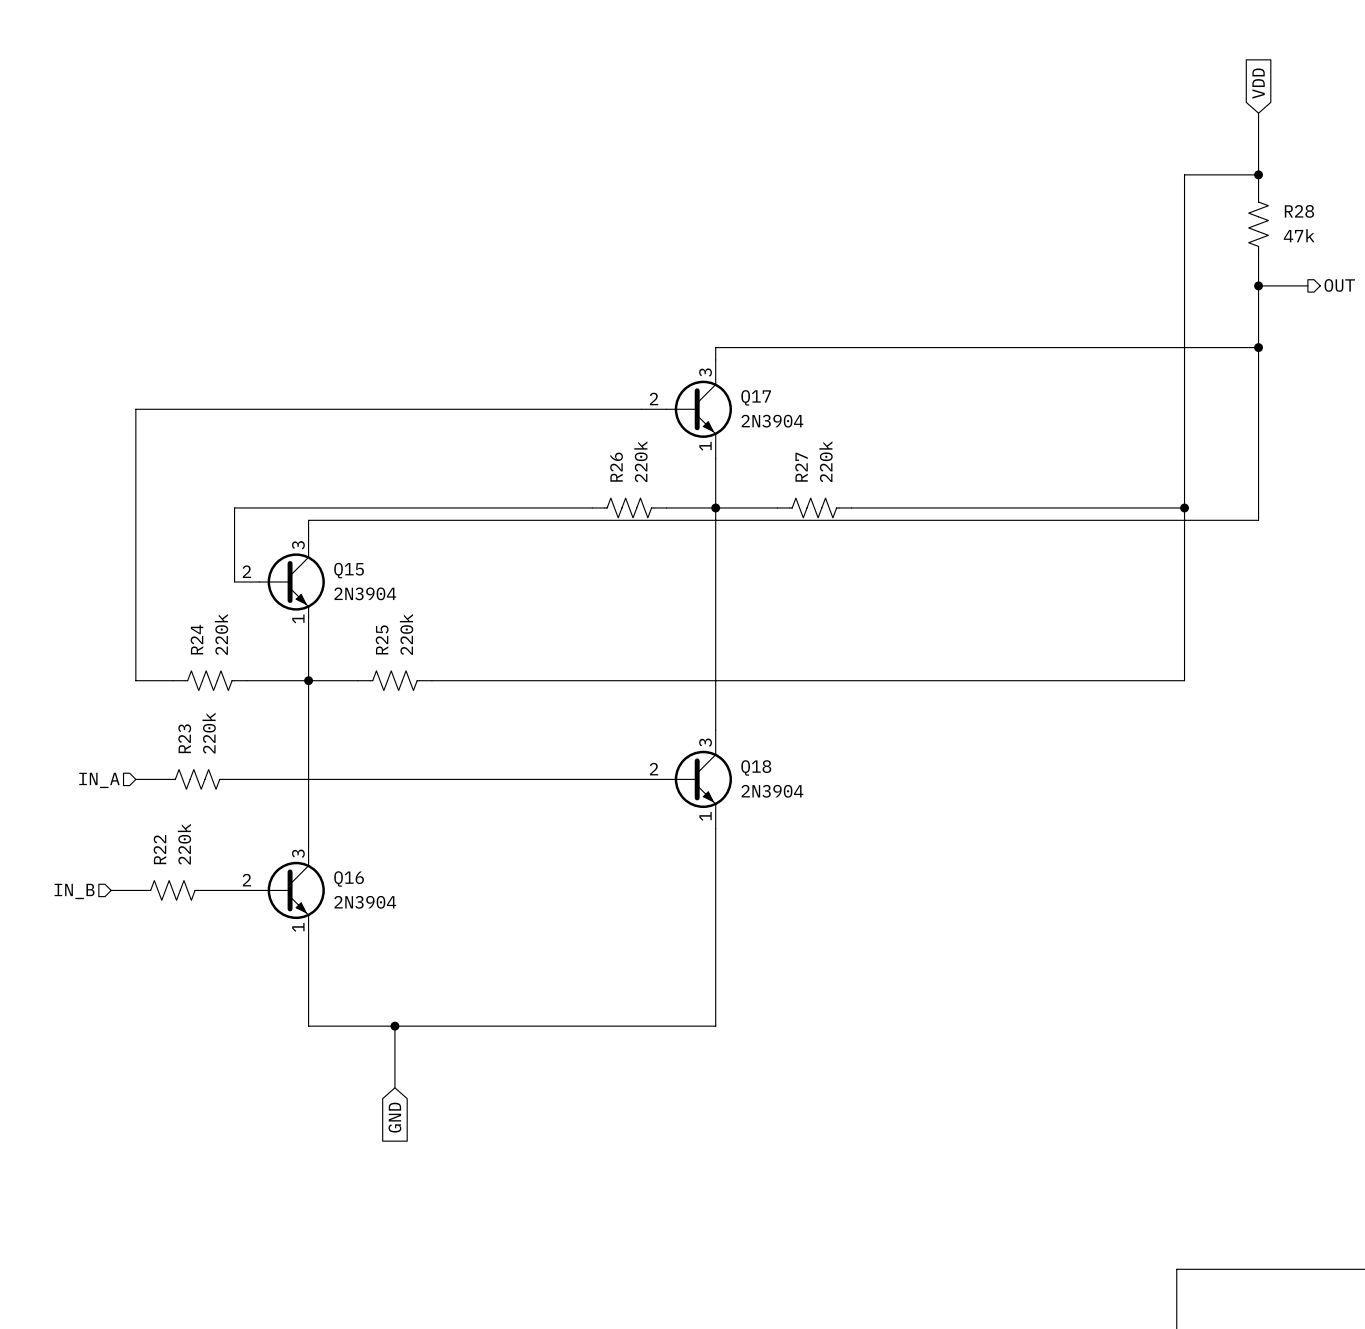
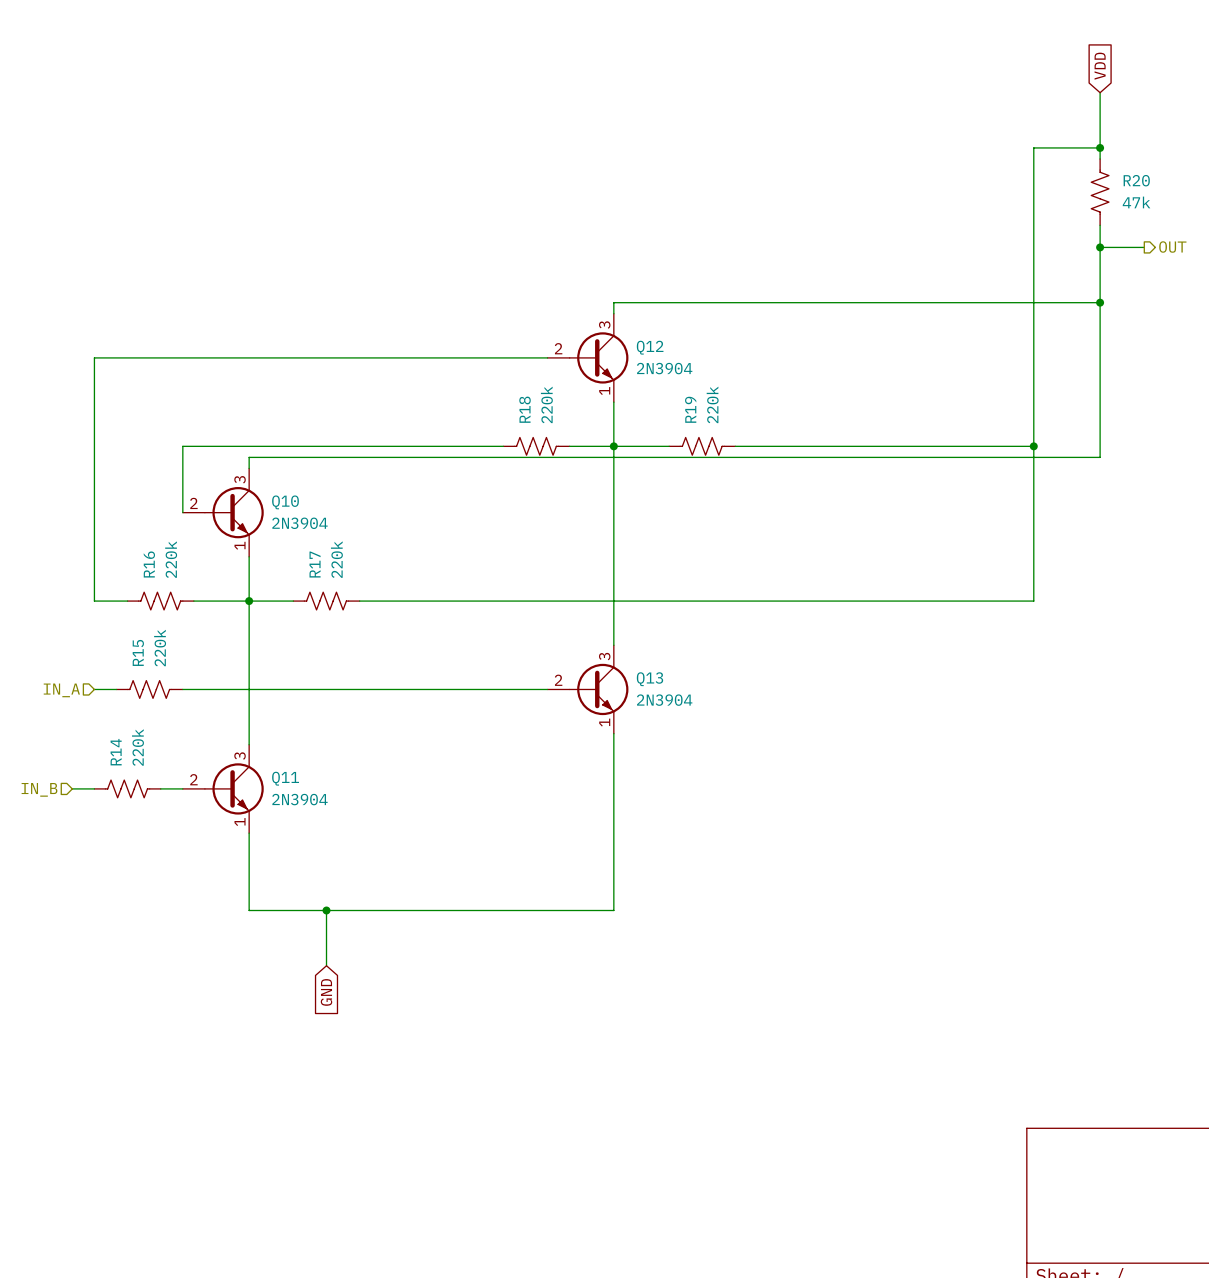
R28 name: R28 (1299, 211) -> R20 (1136, 180)
Q17 name: Q17 (756, 397) -> Q12 (650, 347)
R26 name: R26 (616, 467) -> R18 (525, 409)
R27 name: R27 (801, 467) -> R19 (690, 409)
Q15 name: Q15 (349, 570) -> Q10 (285, 502)
R24 name: R24 (196, 639) -> R16 (149, 564)
R25 name: R25 (382, 639) -> R17 (315, 564)
R23 name: R23 (184, 738) -> R15 (138, 652)
Q18 name: Q18 (756, 767) -> Q13 (649, 679)
R22 name: R22 (159, 849) -> R14 (116, 752)
Q16 name: Q16 (349, 878) -> Q11 (285, 778)

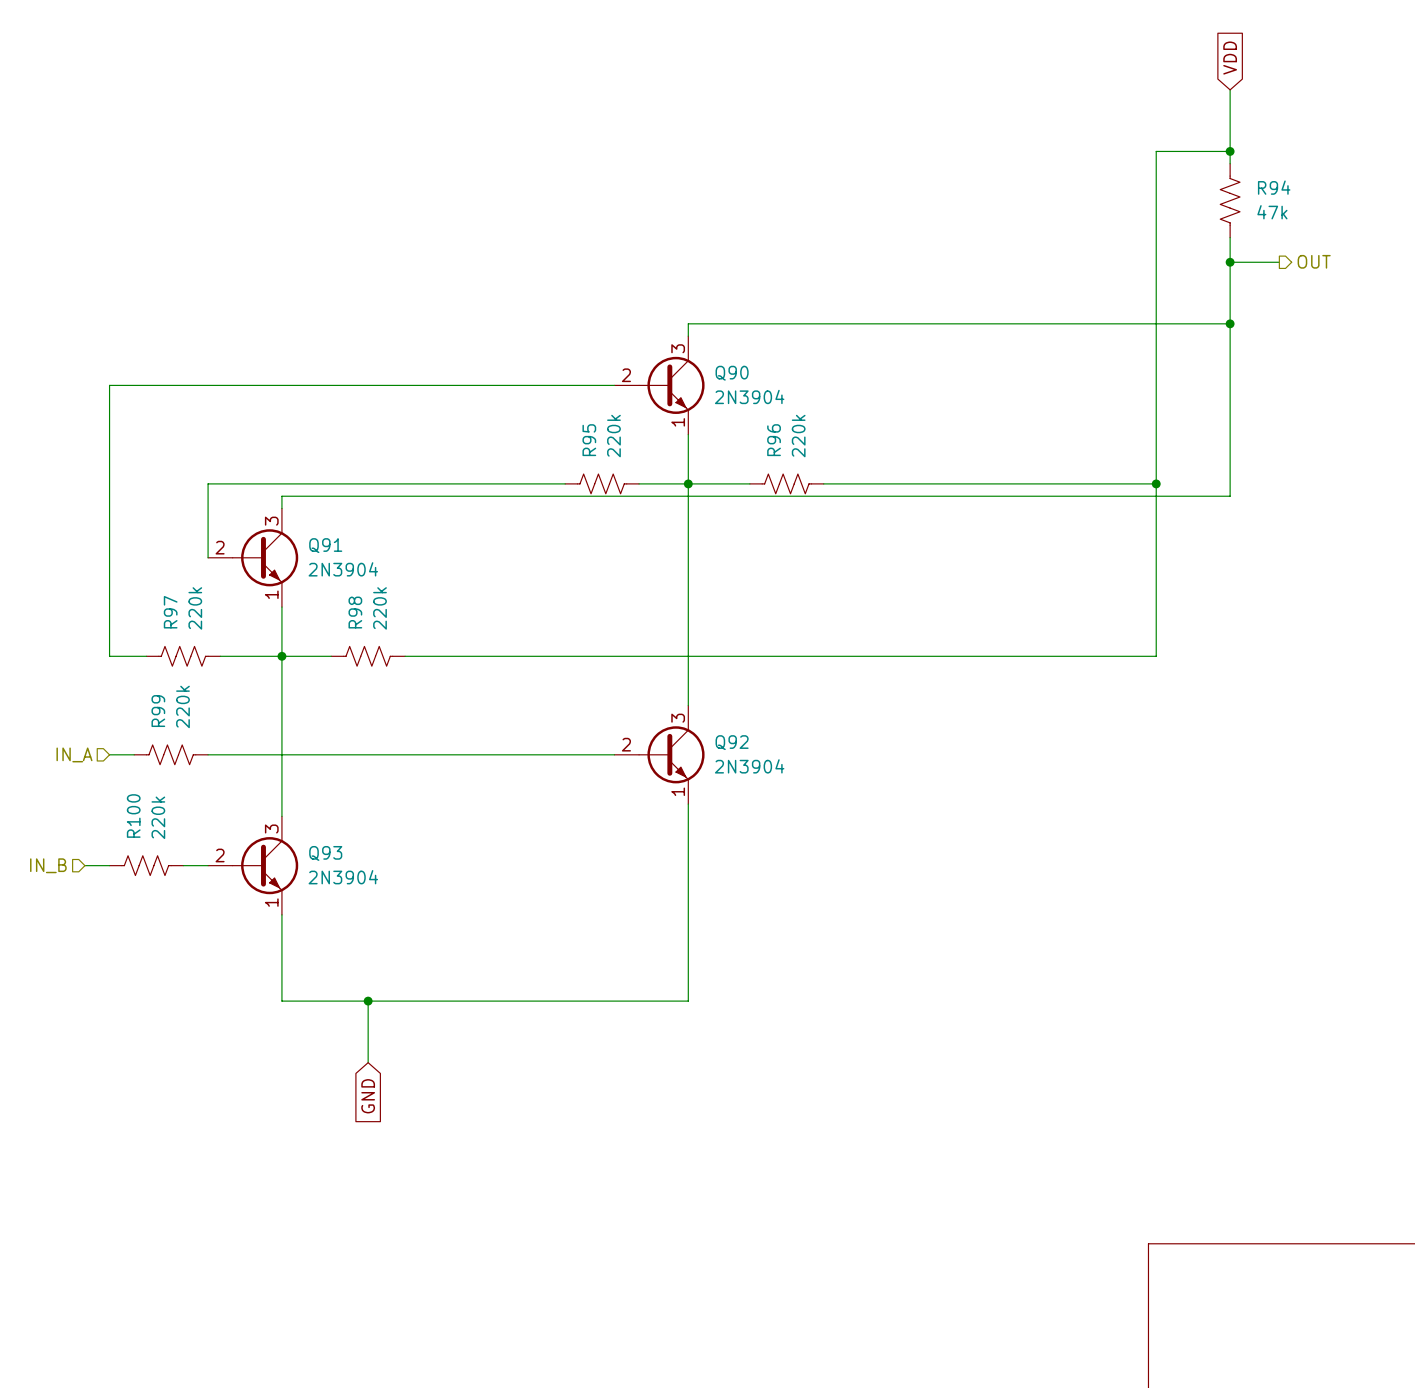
R20 name: R20 (1136, 180) -> R94 (1274, 187)
Q12 name: Q12 (650, 347) -> Q90 (732, 373)
R18 name: R18 (525, 409) -> R95 (589, 440)
R19 name: R19 (690, 409) -> R96 (774, 440)
Q10 name: Q10 (285, 502) -> Q91 (325, 545)
R16 name: R16 (149, 564) -> R97 (170, 612)
R17 name: R17 (315, 564) -> R98 (355, 612)
R15 name: R15 (138, 652) -> R99 (158, 711)
Q13 name: Q13 (649, 679) -> Q92 (732, 742)
R14 name: R14 (116, 752) -> R100 (133, 816)
Q11 name: Q11 (285, 778) -> Q93 (325, 853)

